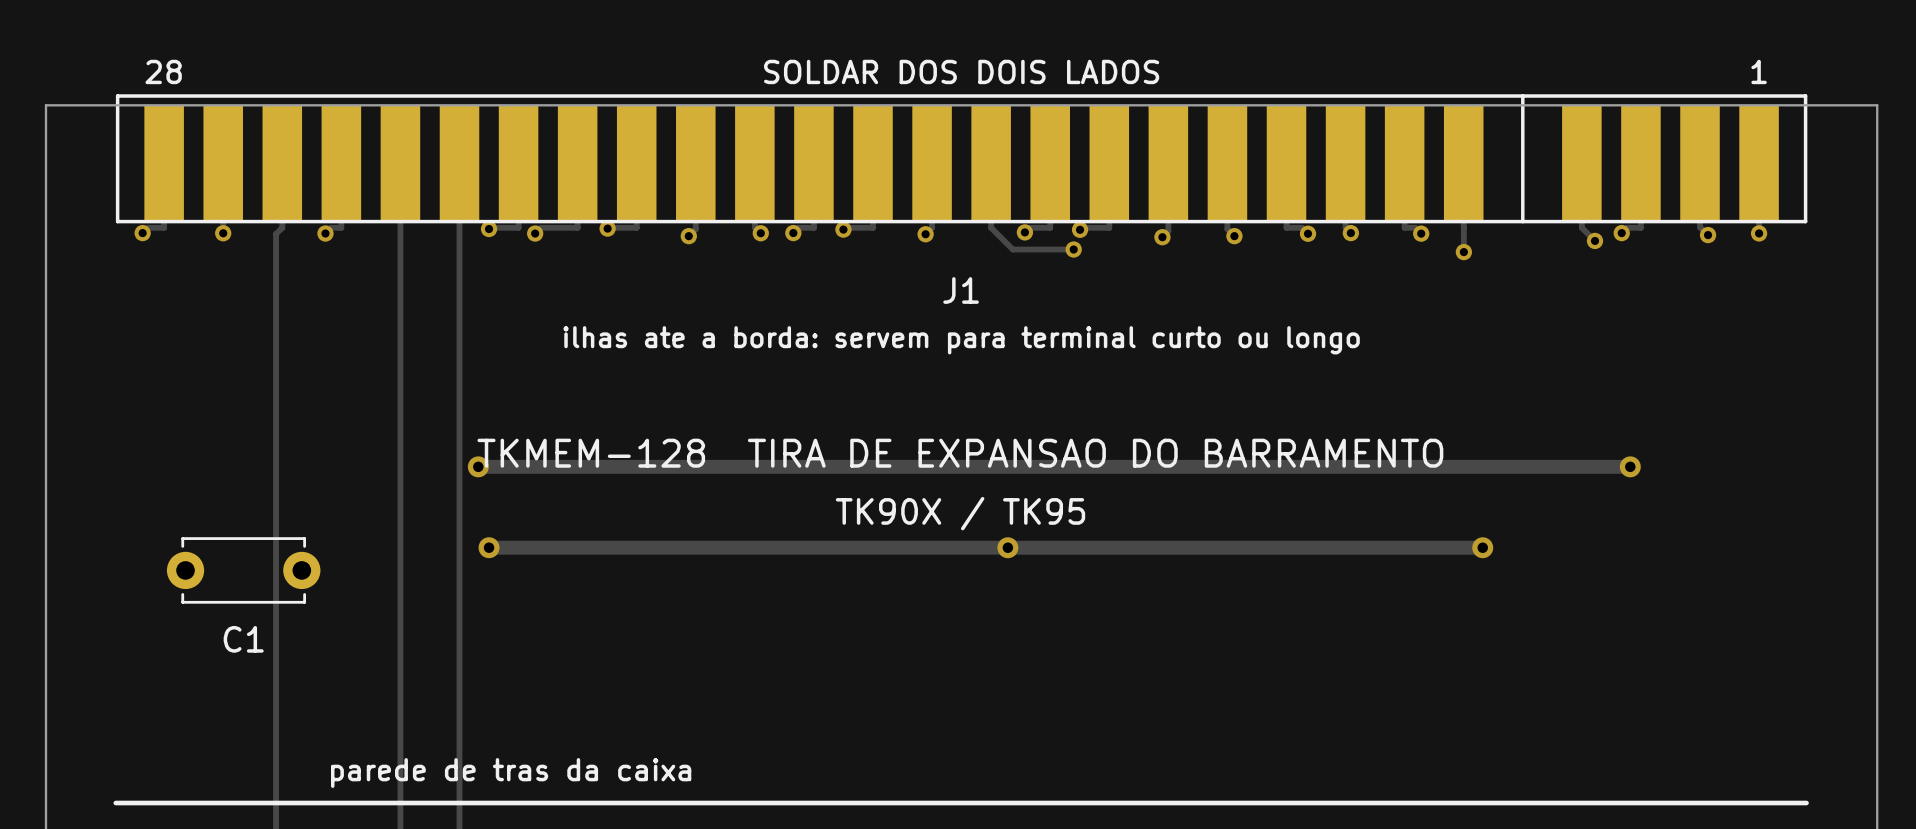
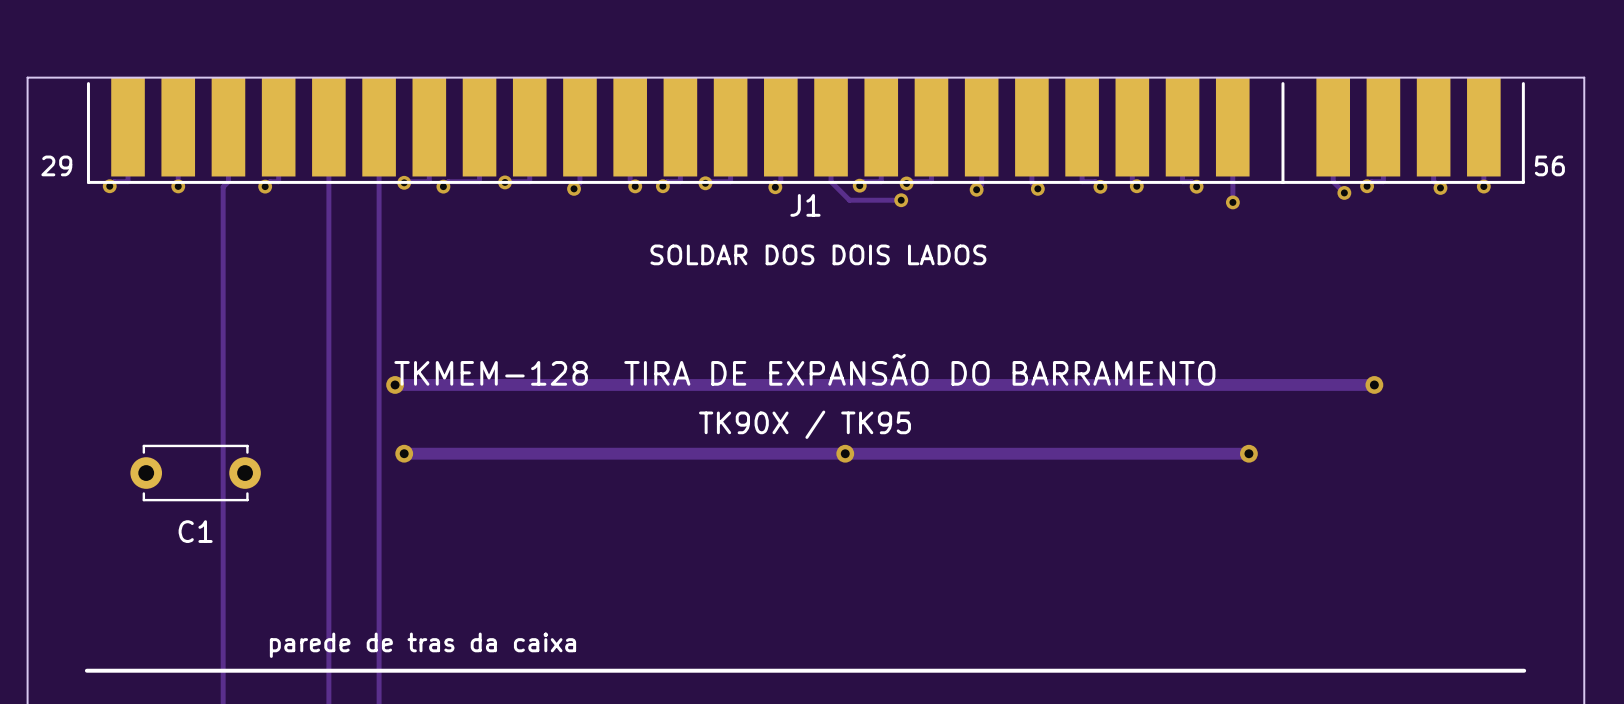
J1 footprint: [115, 94, 1808, 224] -> [87, 77, 1525, 184]
text: ilhas ate a borda: servem para terminal curto ou longo (961, 340) -> none
text: TKMEM-128 TIRA DE EXPANSAO DO BARRAMENTO (960, 453) -> TKMEM-128 TIRA DE EXPANSÃO DO BARRAMENTO (804, 369)

